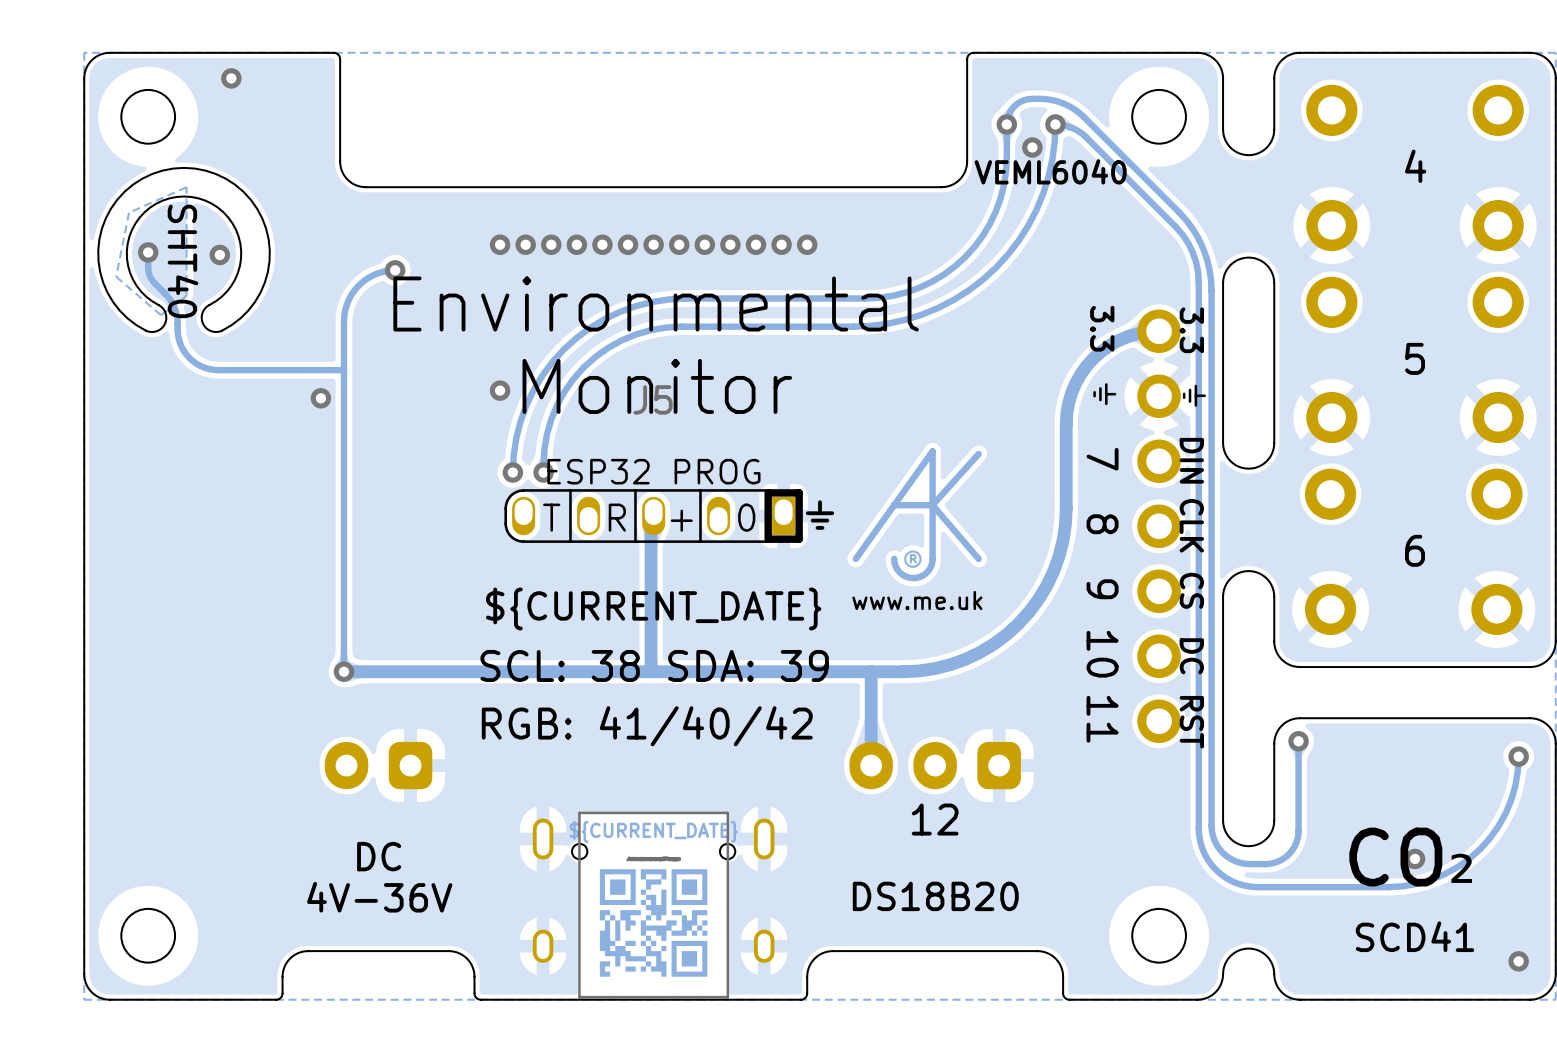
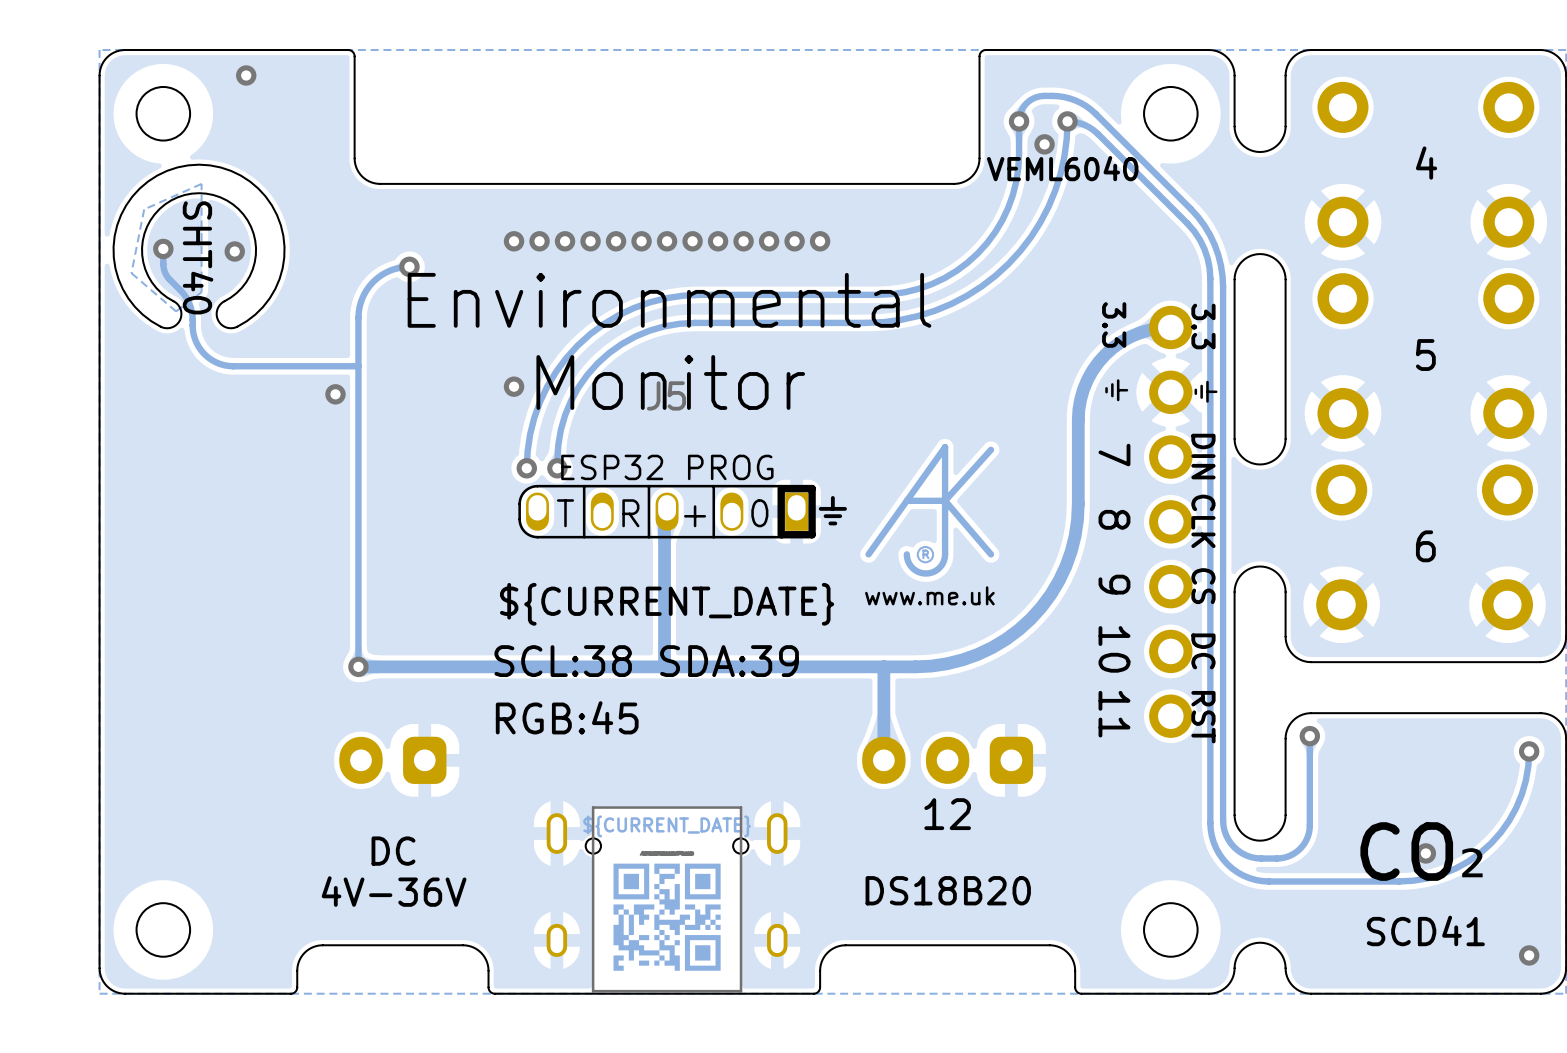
text: SCL: 38 SDA: 39 (654, 665) -> SCL:38 SDA:39 (646, 661)
text: RGB: 41/40/42 (647, 726) -> RGB:45 (567, 717)

